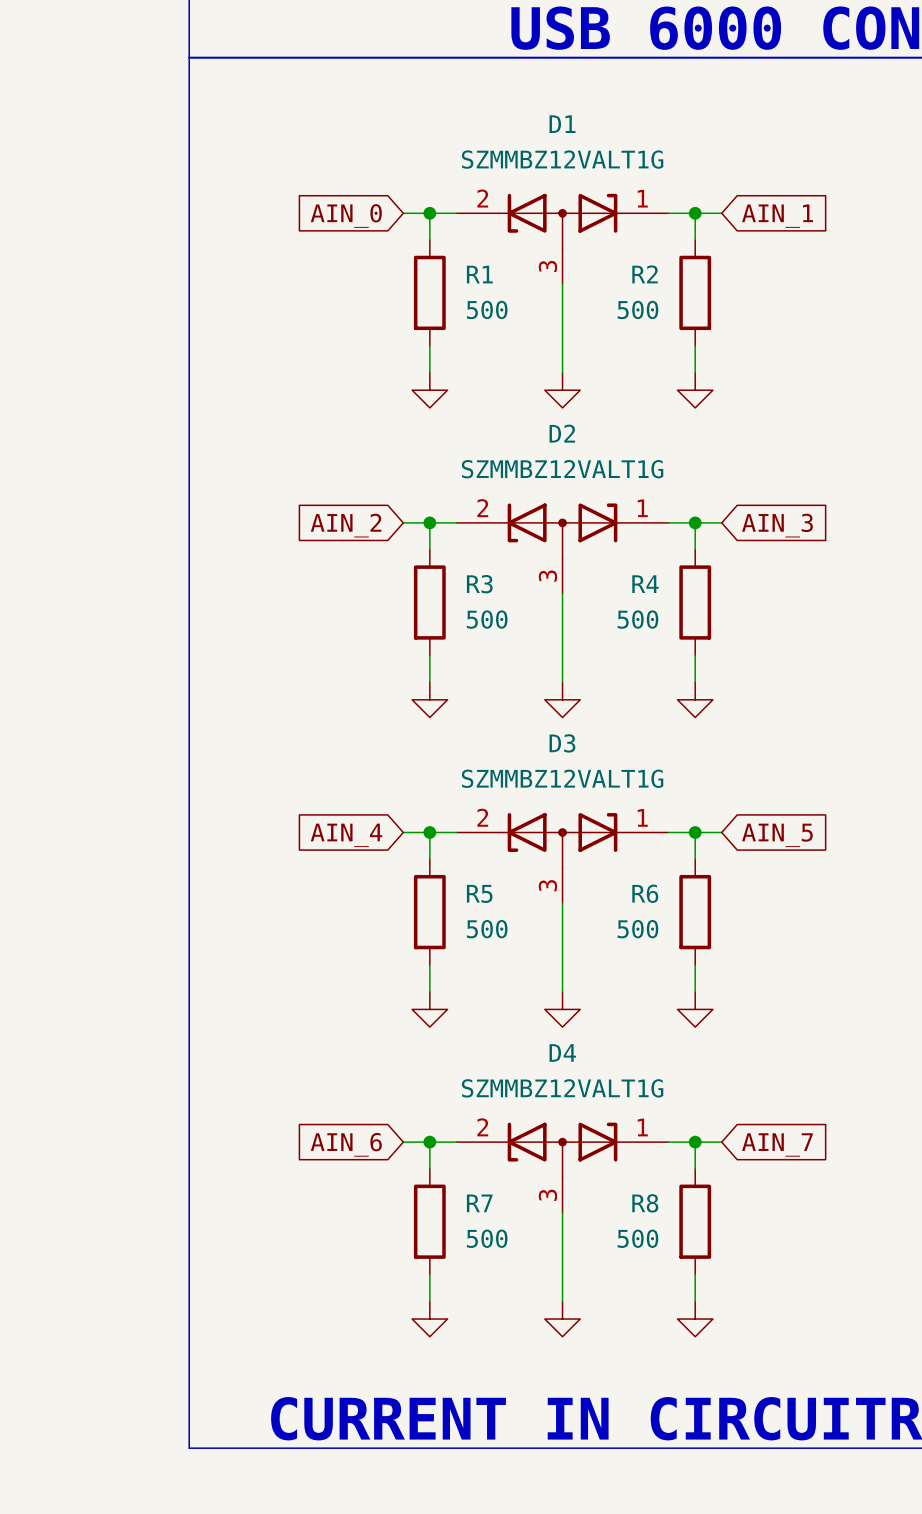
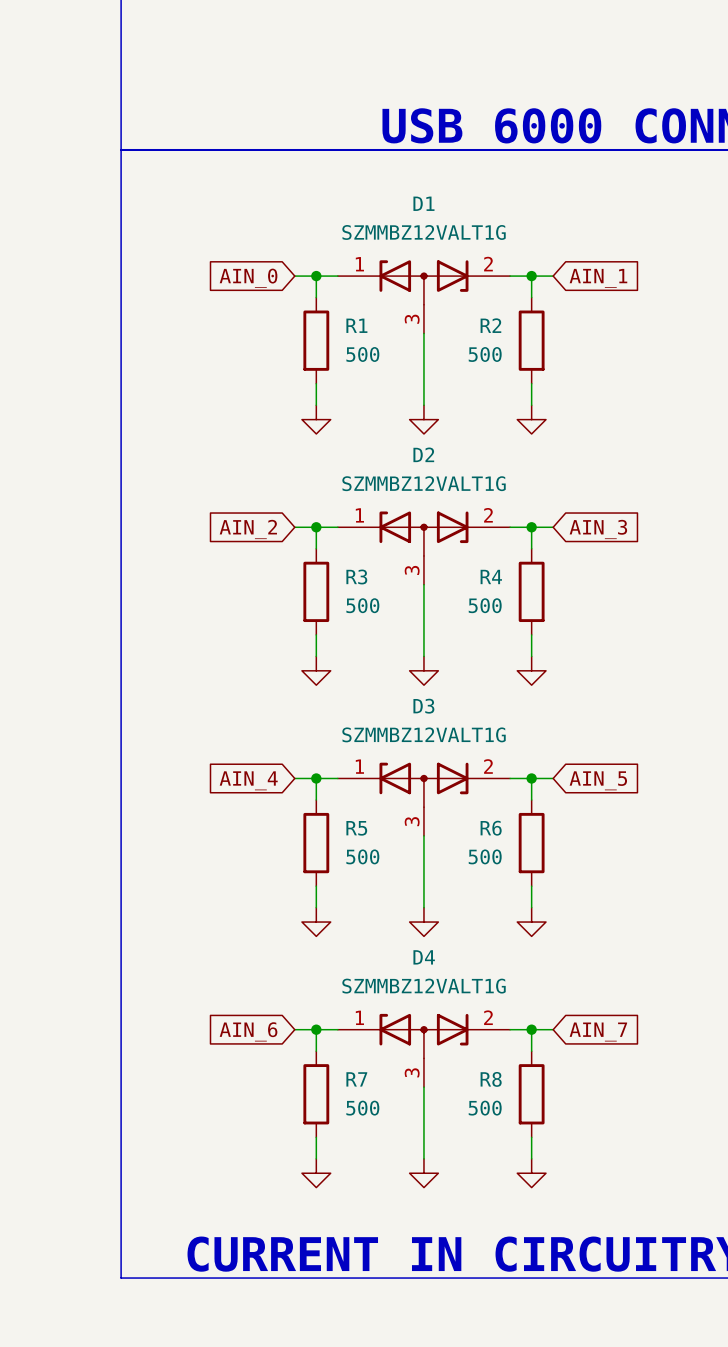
D1 flip: as is (562, 221) -> left-right (423, 282)
D2 flip: as is (562, 530) -> left-right (423, 533)
D3 flip: as is (562, 840) -> left-right (423, 784)
D4 flip: as is (562, 1150) -> left-right (423, 1036)

